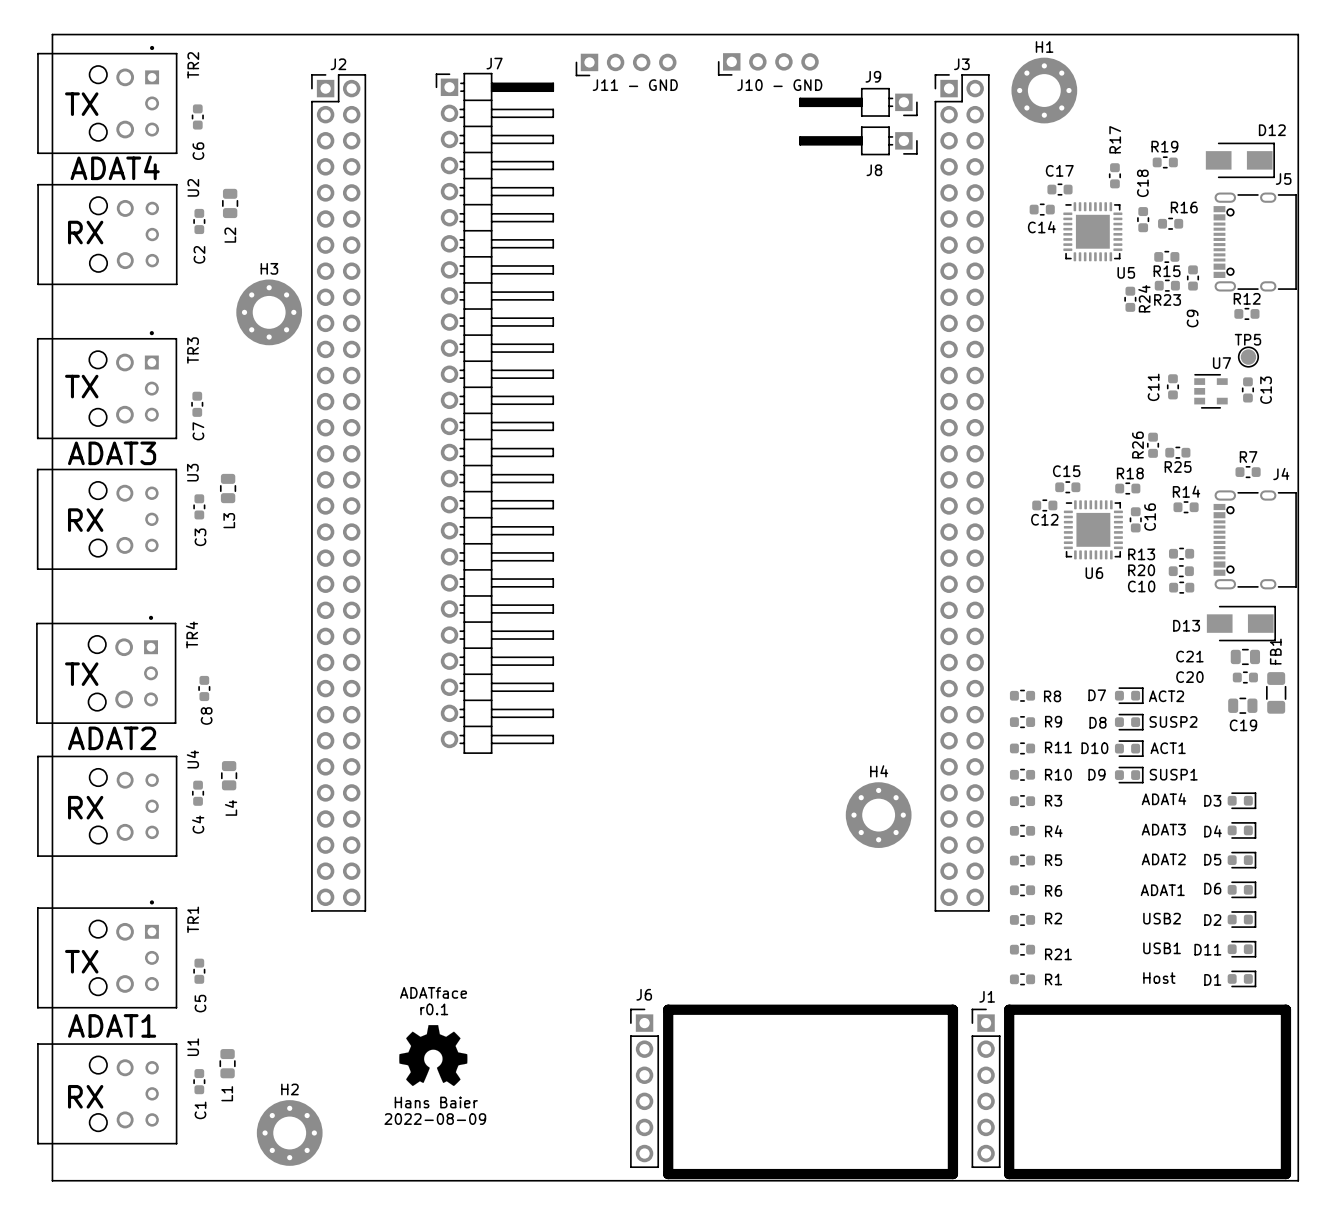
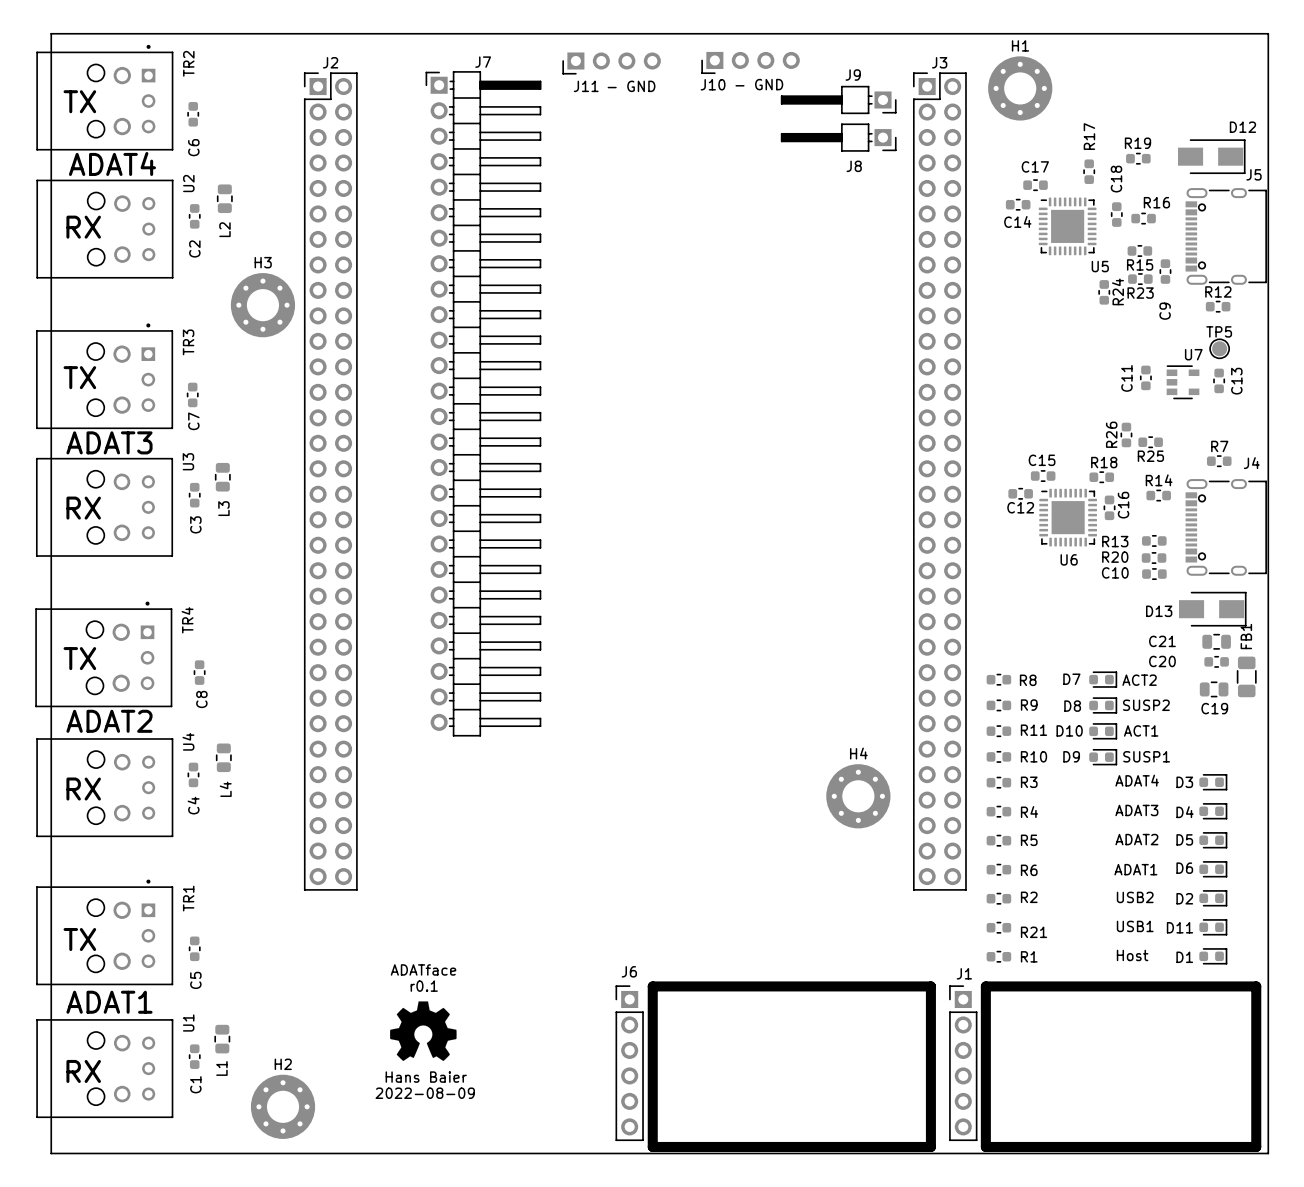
J11 - GND name: J11 - GND (635, 85) -> J11 (586, 86)
J10 - GND name: J10 - GND (779, 85) -> J10 (713, 84)
text: none -> - GND (759, 84)
text: none -> - GND (631, 86)

